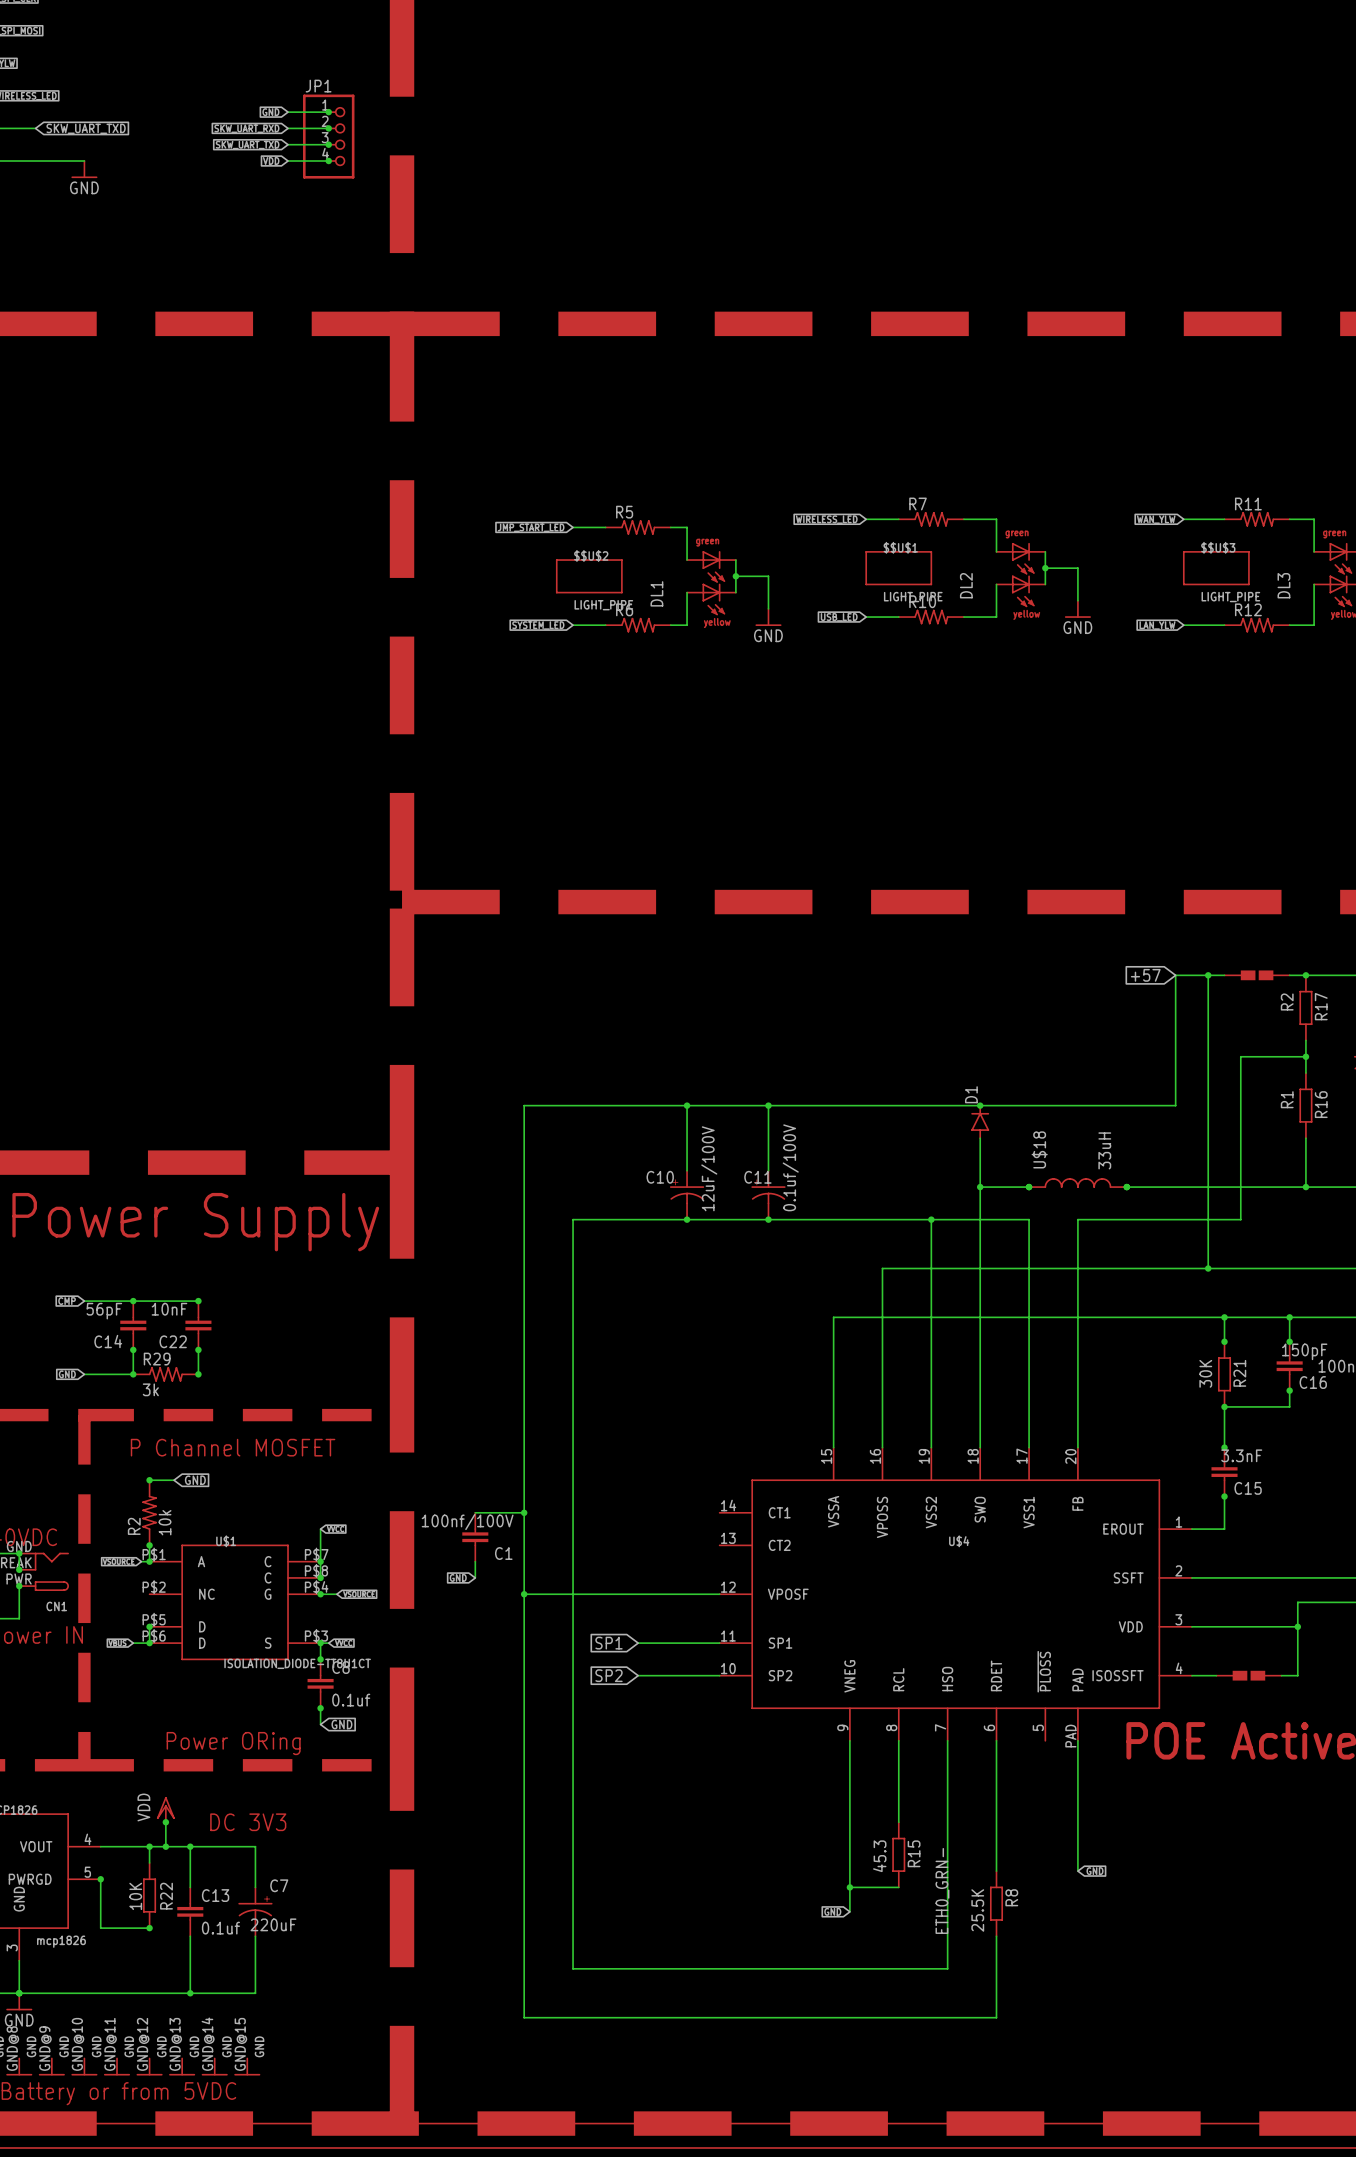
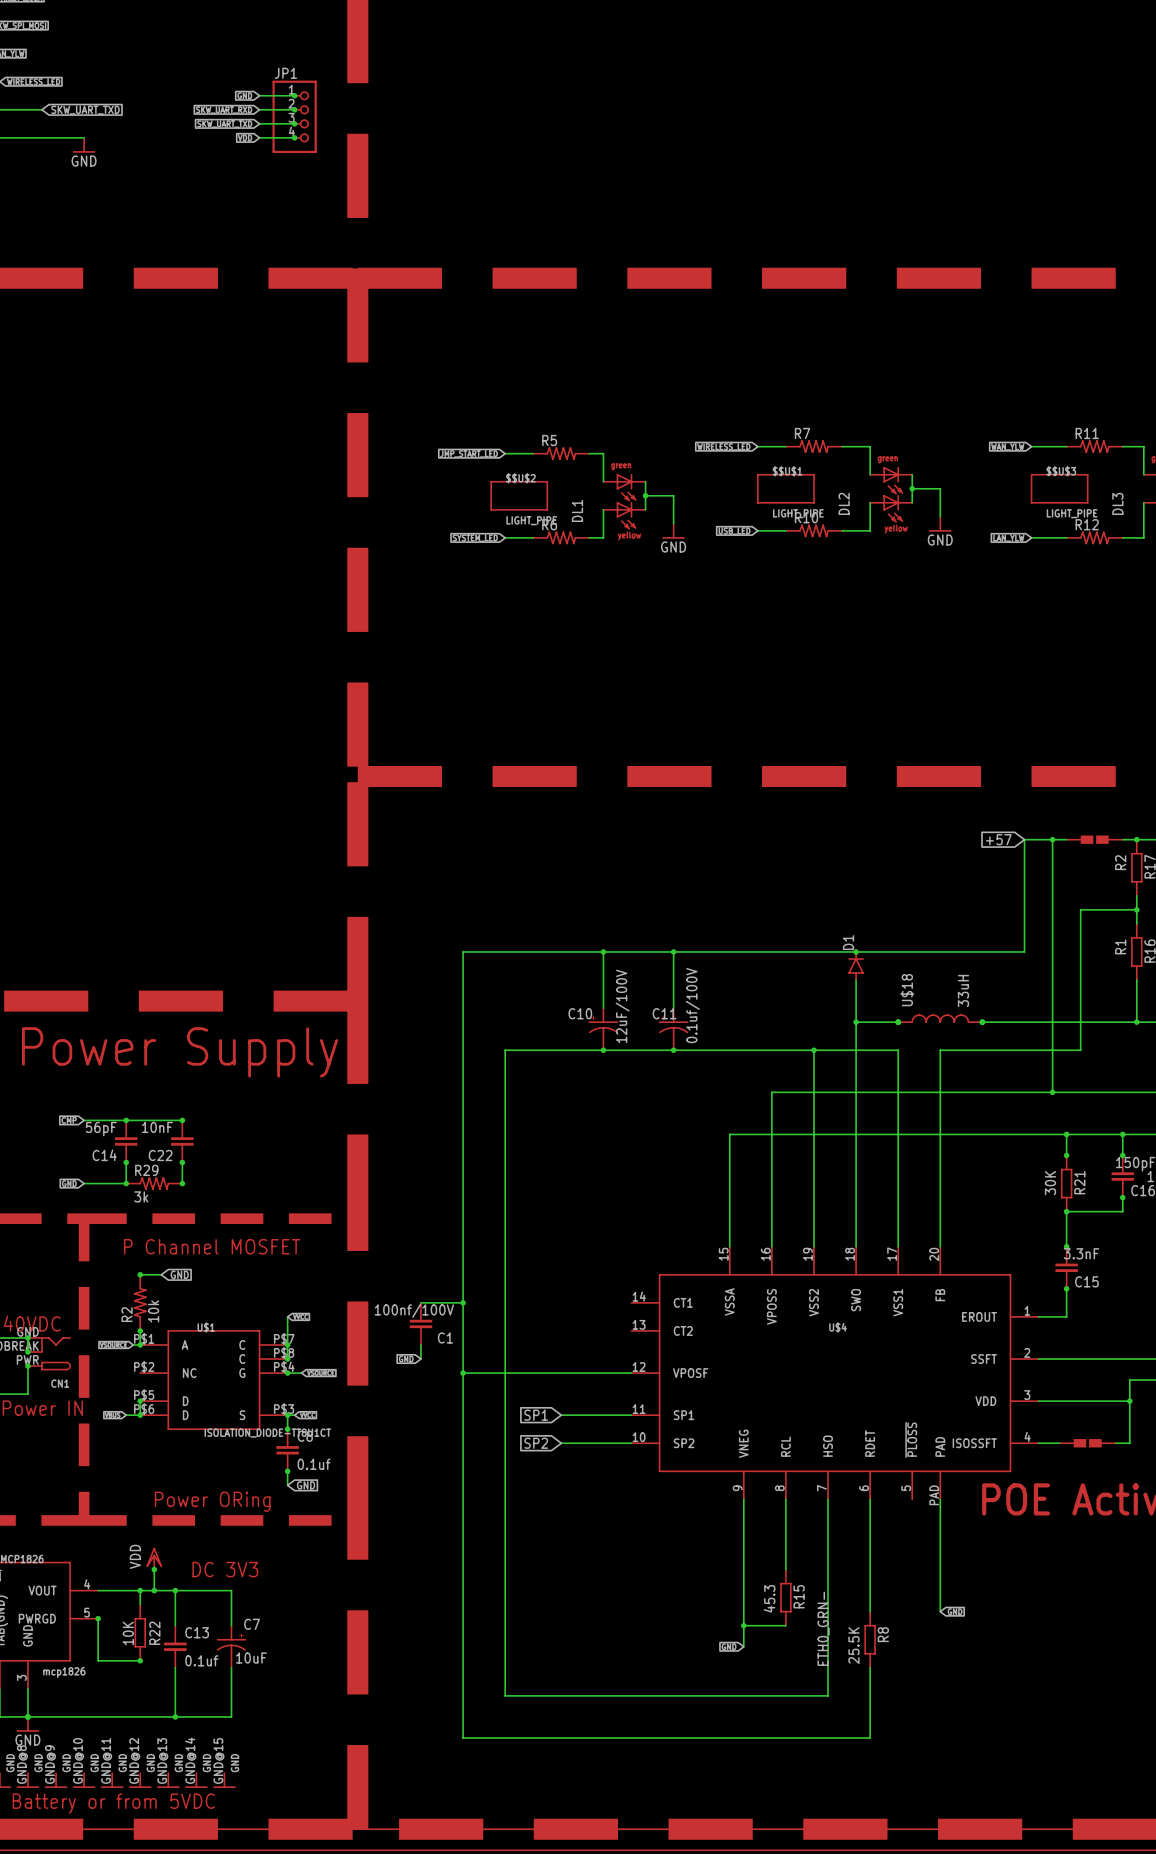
C7 value: 220uF (273, 1924) -> 10uF (251, 1658)

